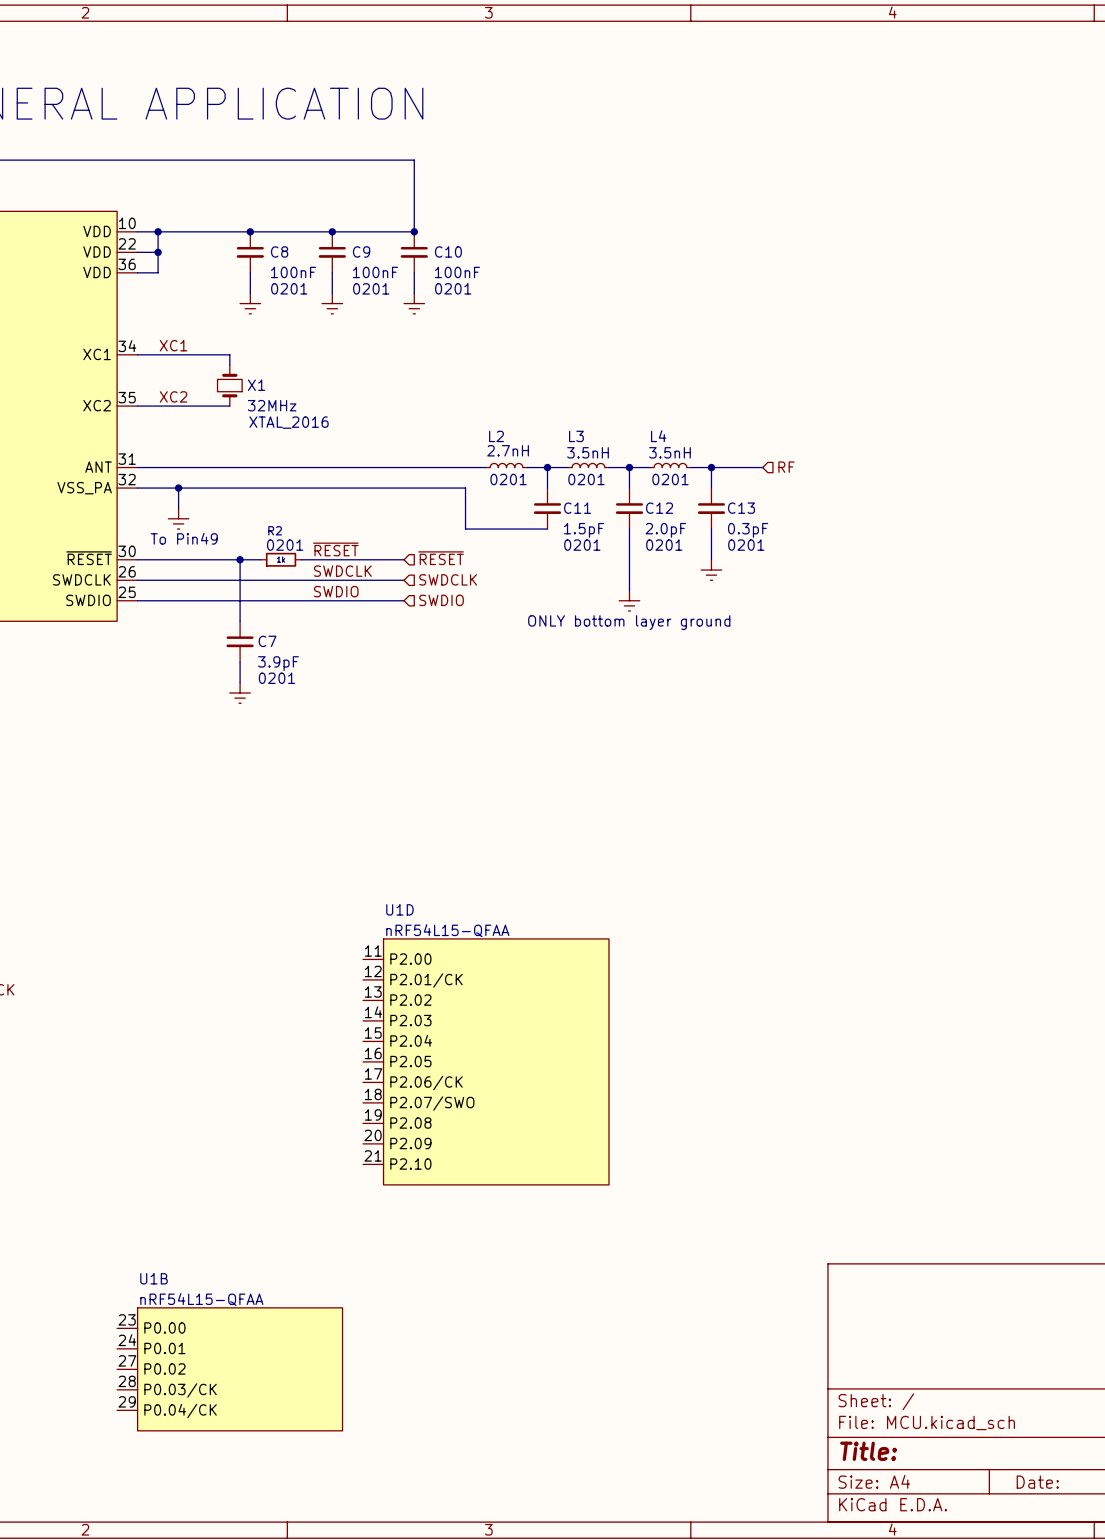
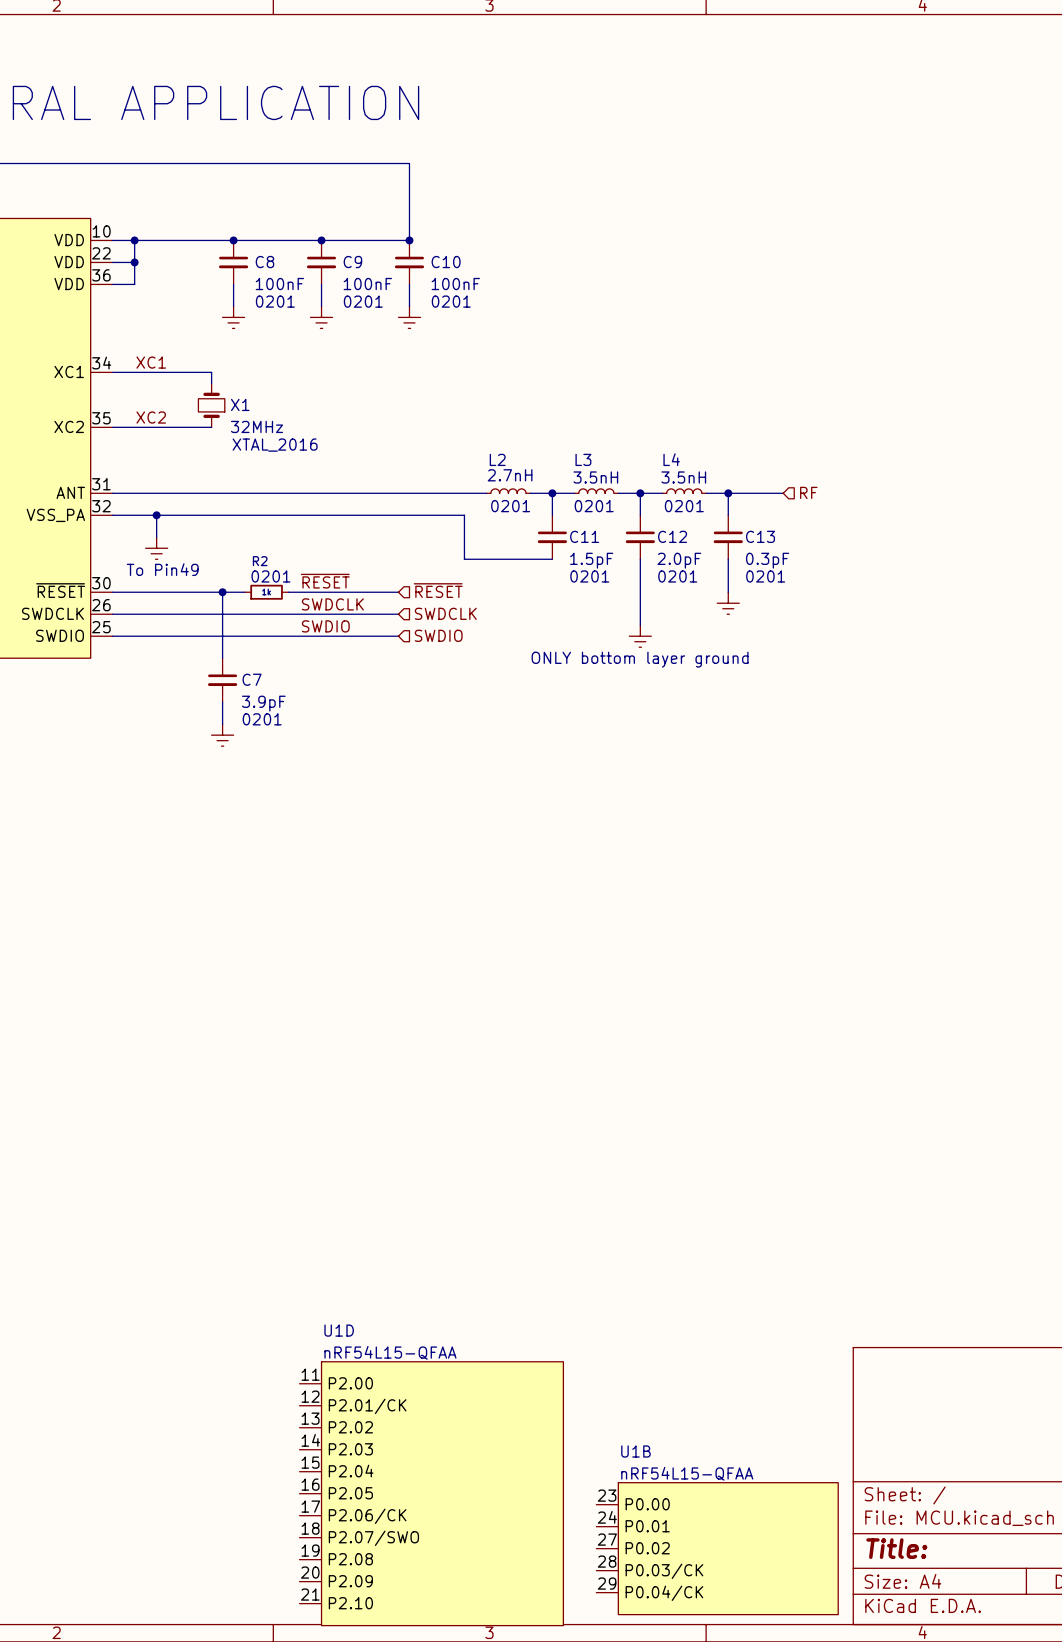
U1D position: (486, 1061) -> (431, 1493)
U1B position: (229, 1369) -> (717, 1548)

